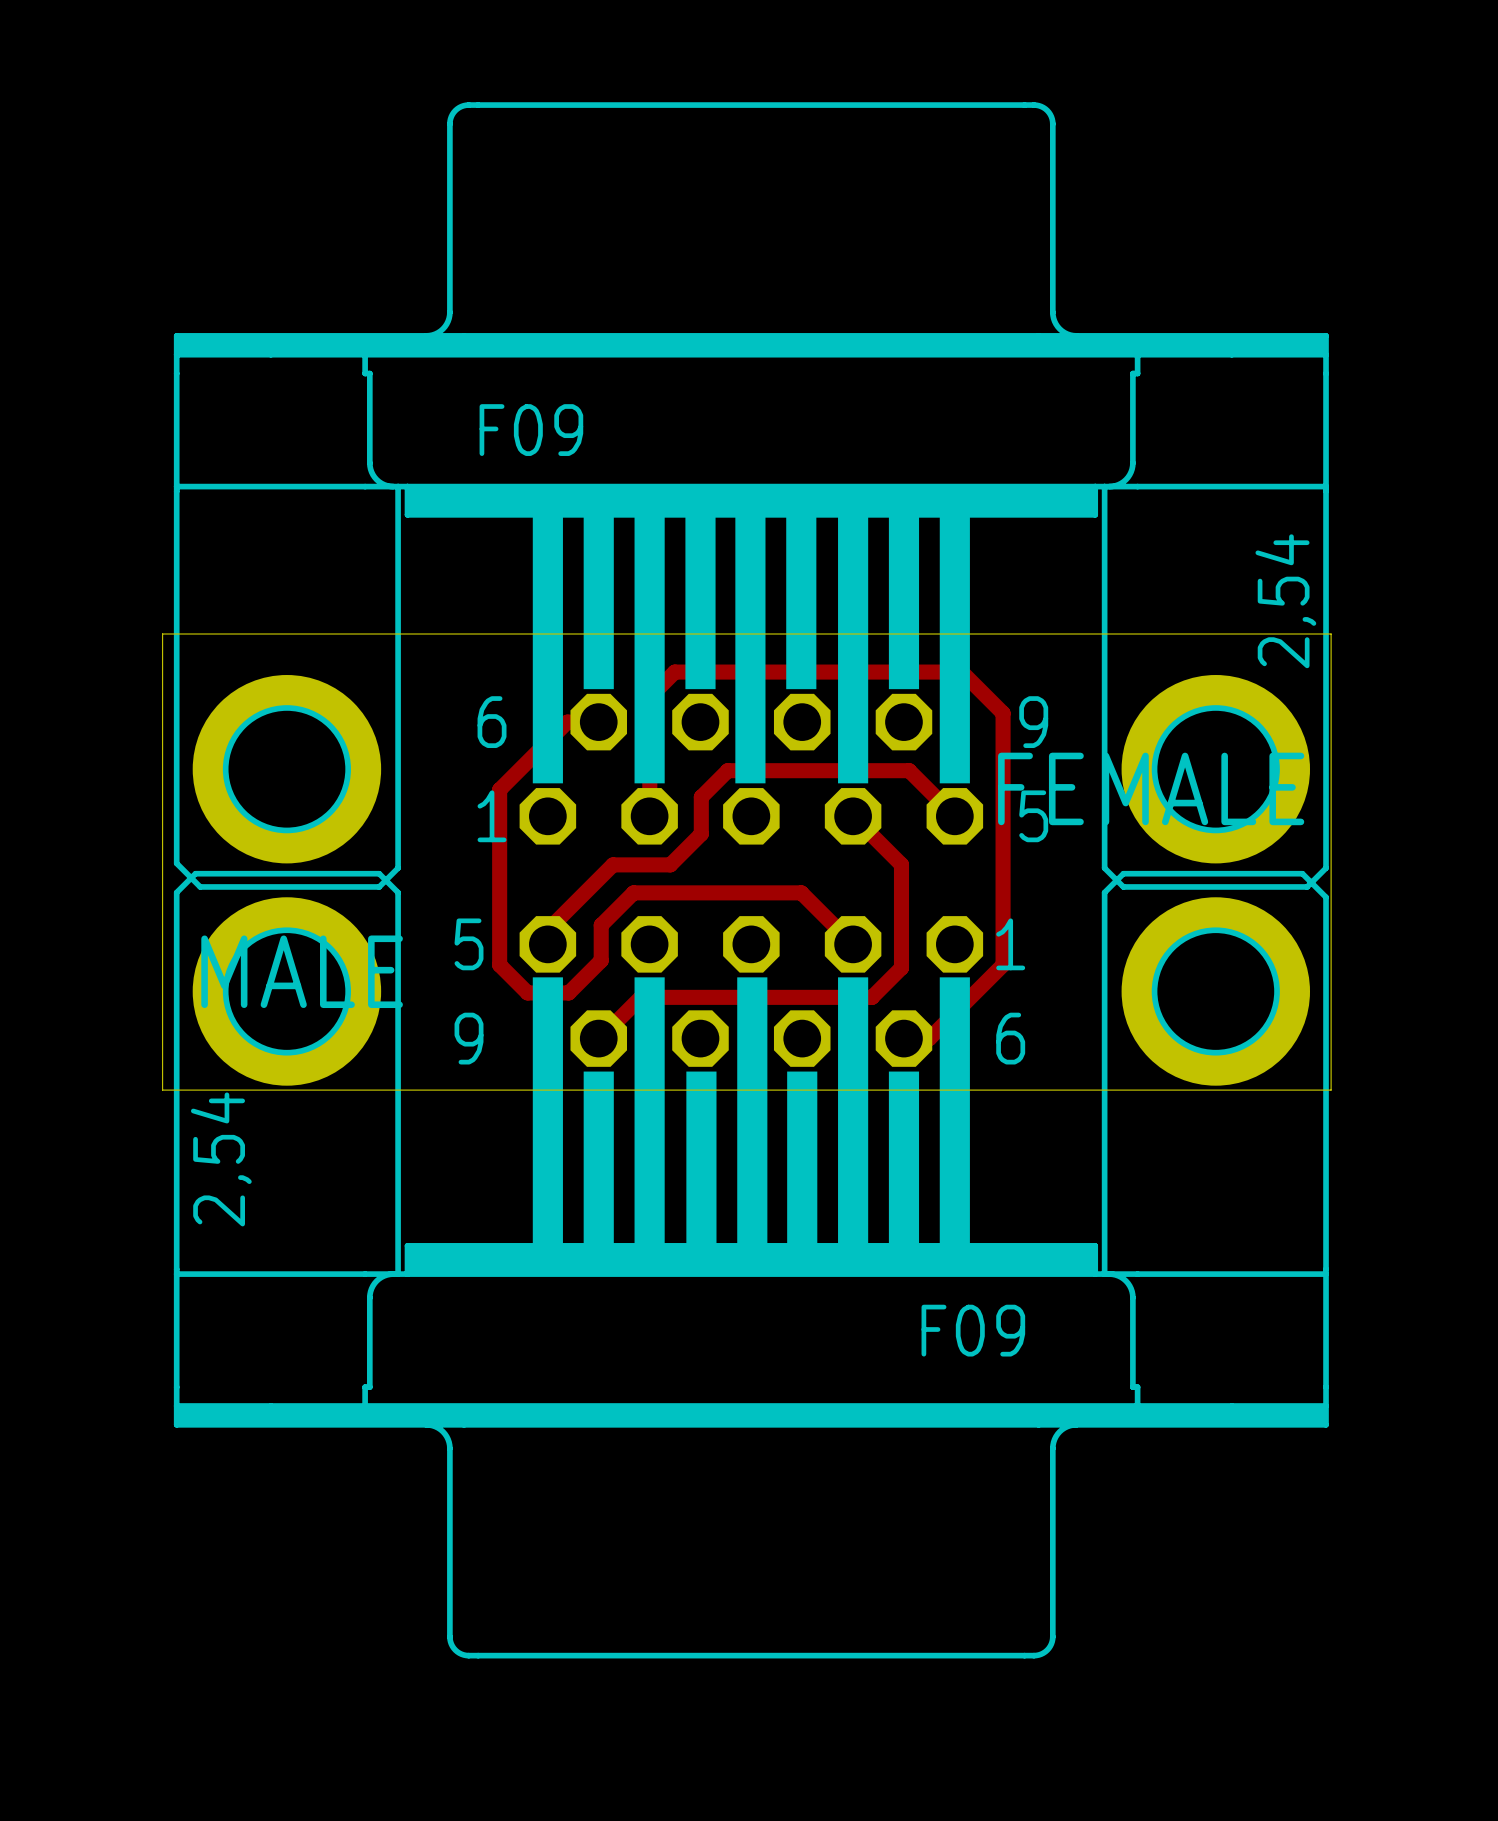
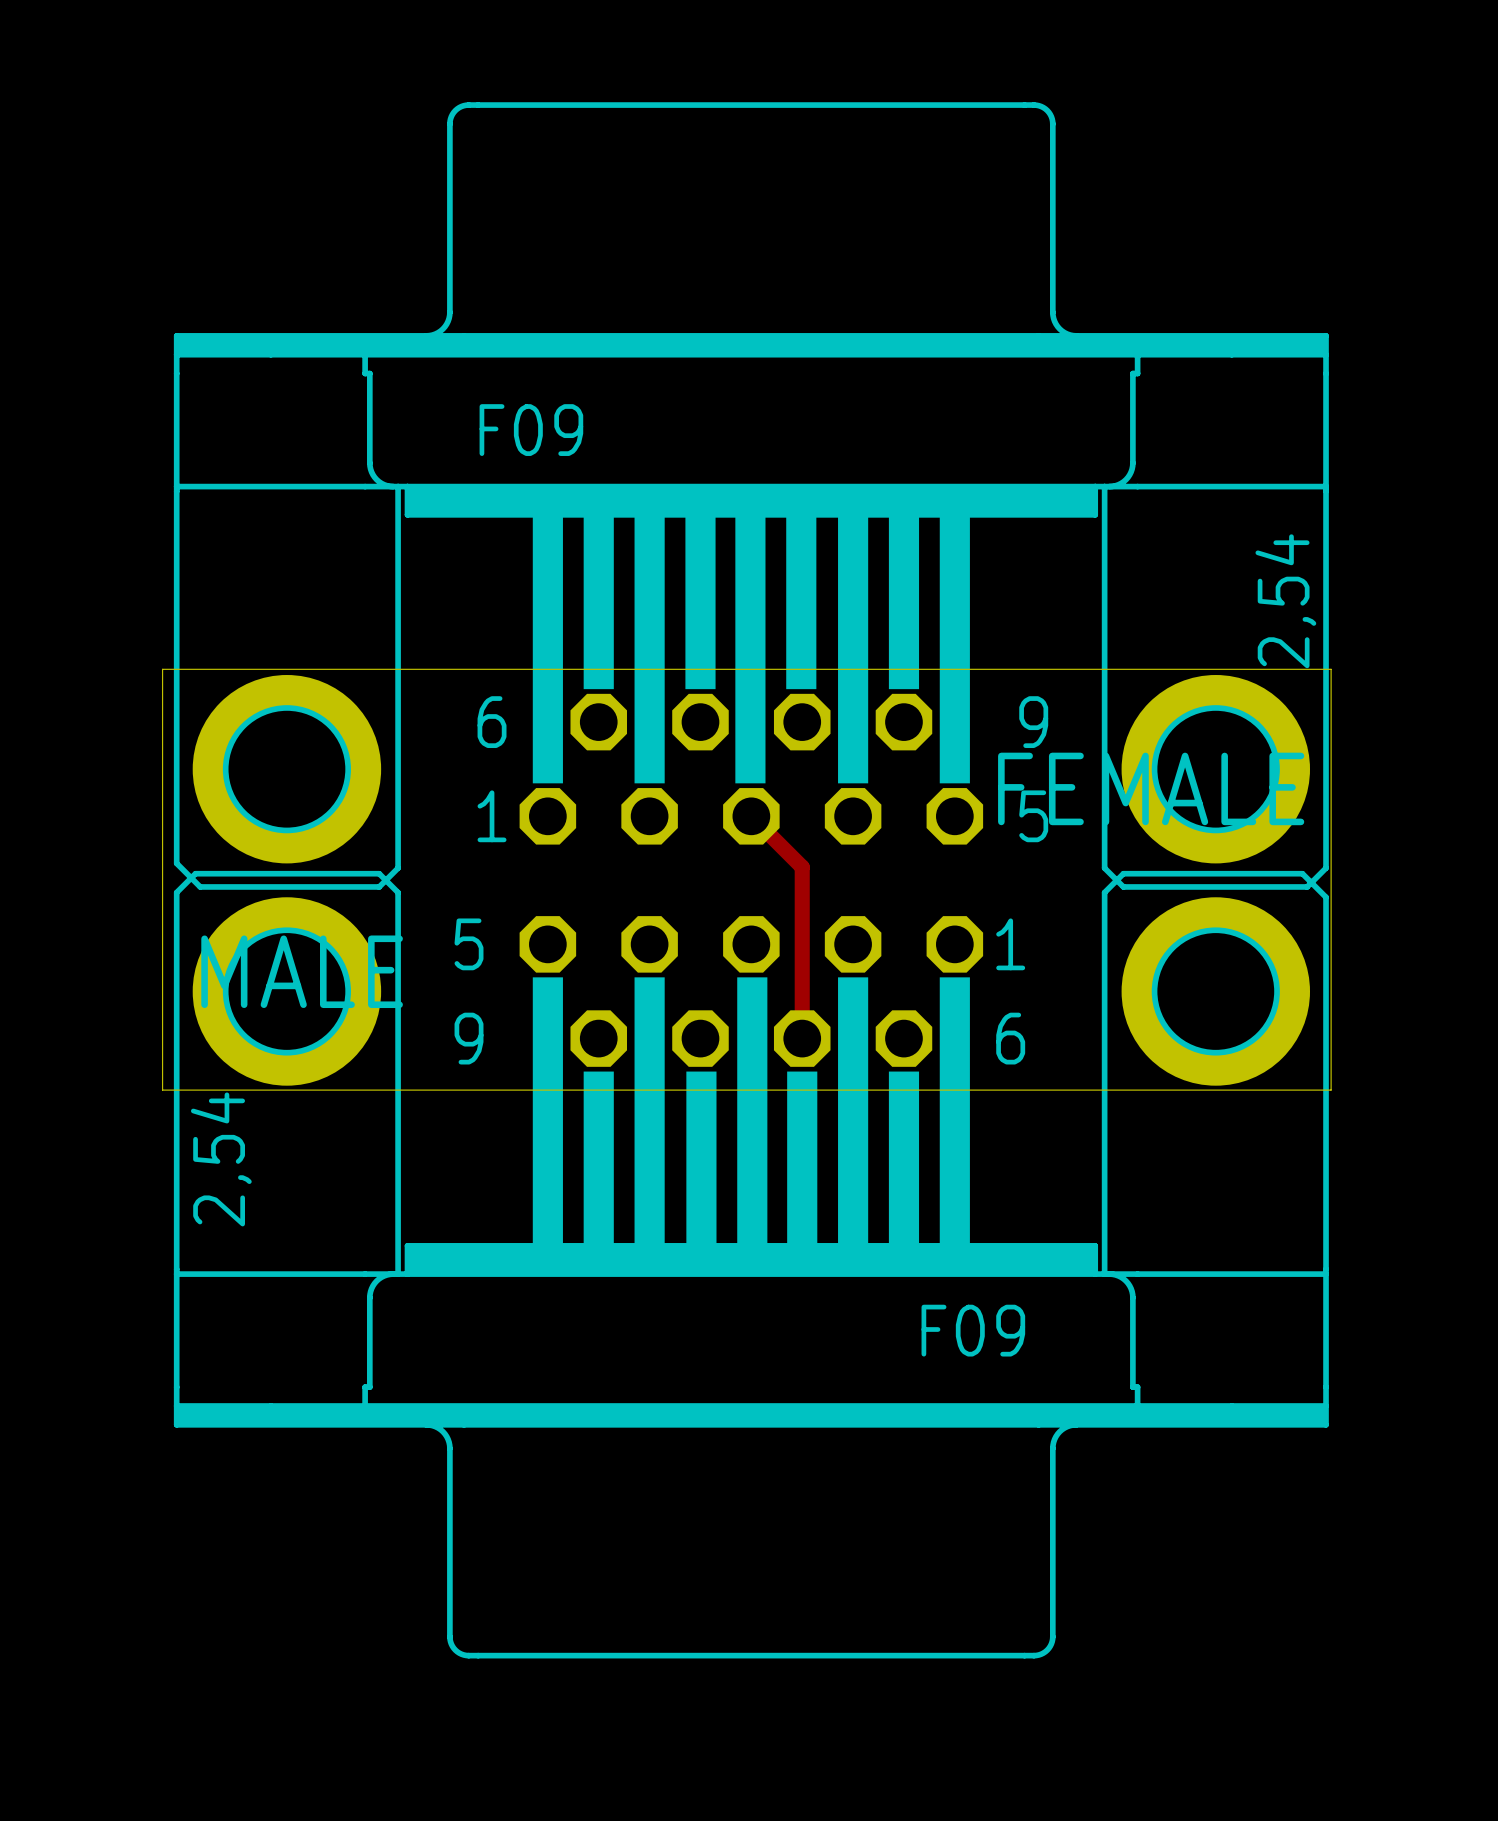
board edge: (162, 669) (162, 634) (1331, 634) (1331, 669) -> (162, 669) (1331, 669)
track: (598, 722) (567, 722) (499, 789) (499, 964) (527, 992) (568, 992) (601, 960) (601, 925) (633, 892) (801, 892) (852, 944) -> none
track: (649, 816) (649, 697) (674, 672) (961, 672) (1003, 713) (1003, 964) (929, 1038) (903, 1038) -> none
track: none -> (751, 816) (802, 867) (802, 1038)
track: (853, 816) (901, 864) (901, 967) (872, 997) (640, 997) (598, 1038) -> none
track: (954, 816) (909, 770) (727, 770) (701, 797) (701, 833) (670, 864) (612, 864) (547, 930) (547, 944) -> none

